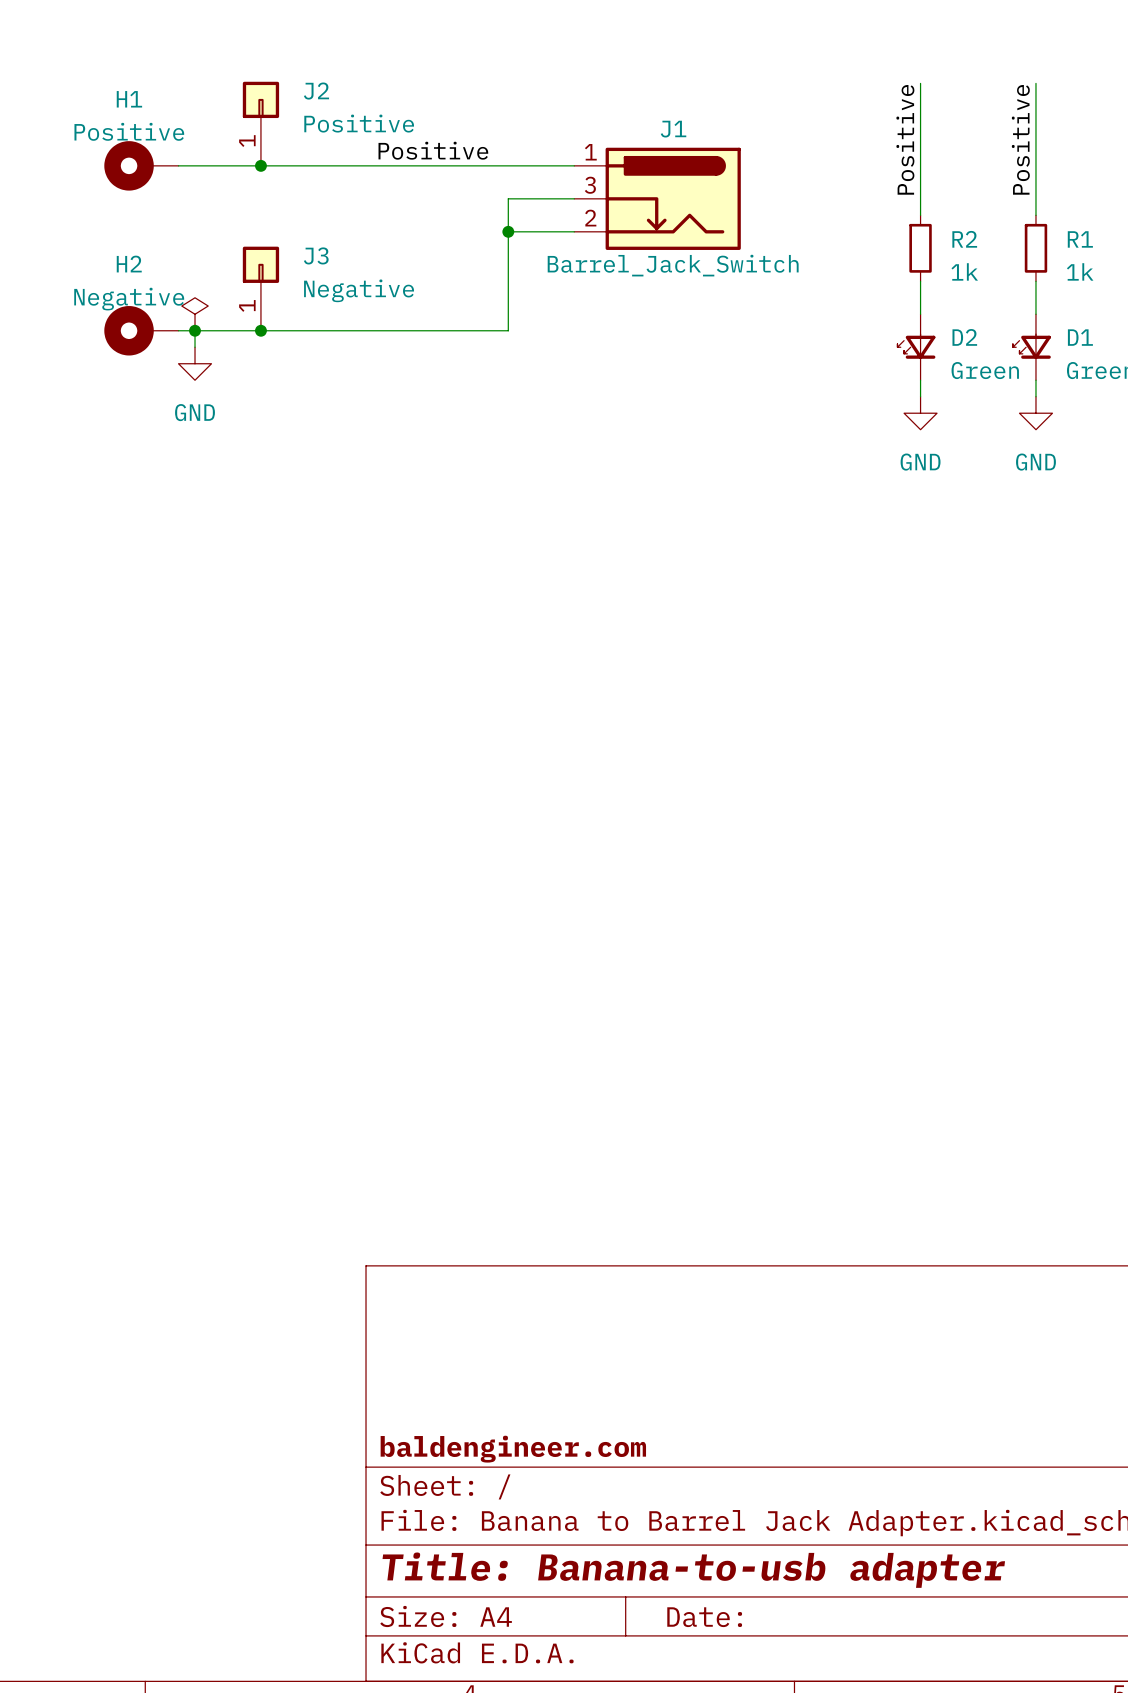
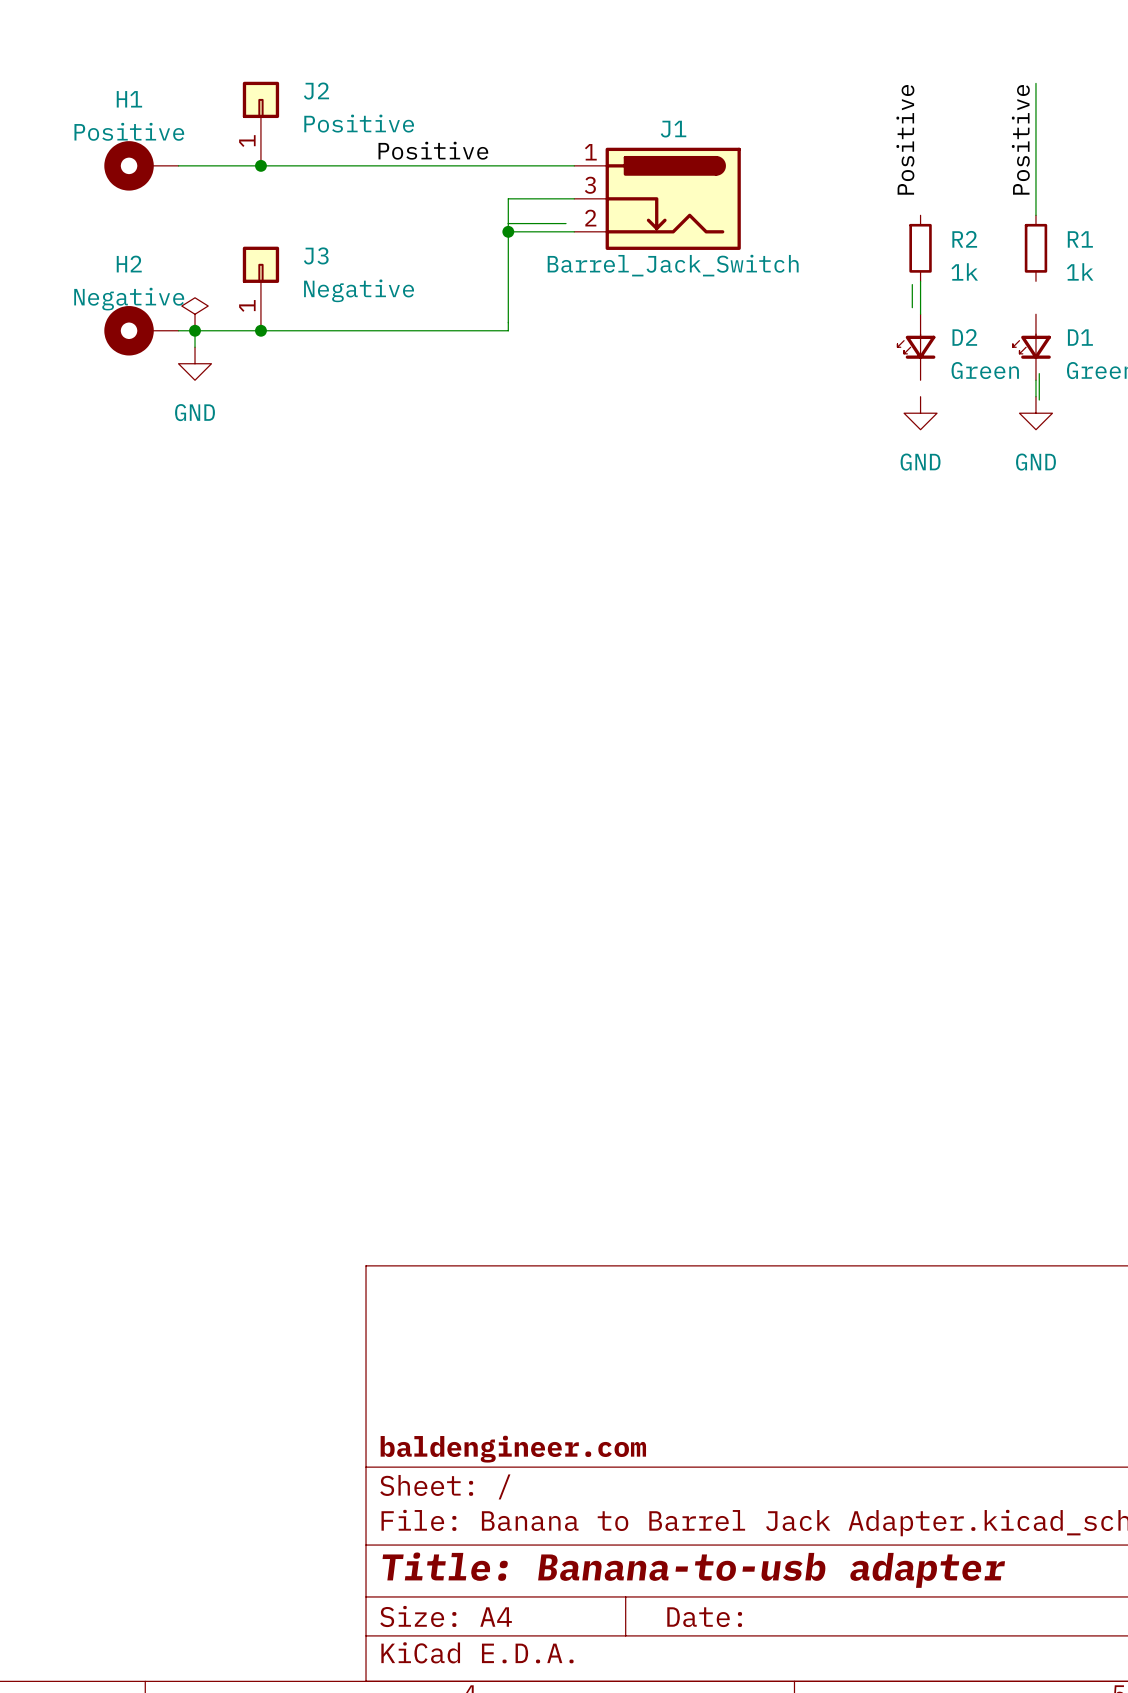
wire: (920, 83) (920, 215) -> none
wire: none -> (508, 223) (566, 223)
wire: (1035, 281) (1035, 314) -> none
wire: none -> (912, 284) (912, 307)
wire: none -> (1039, 373) (1039, 400)
wire: (920, 380) (920, 396) -> none

